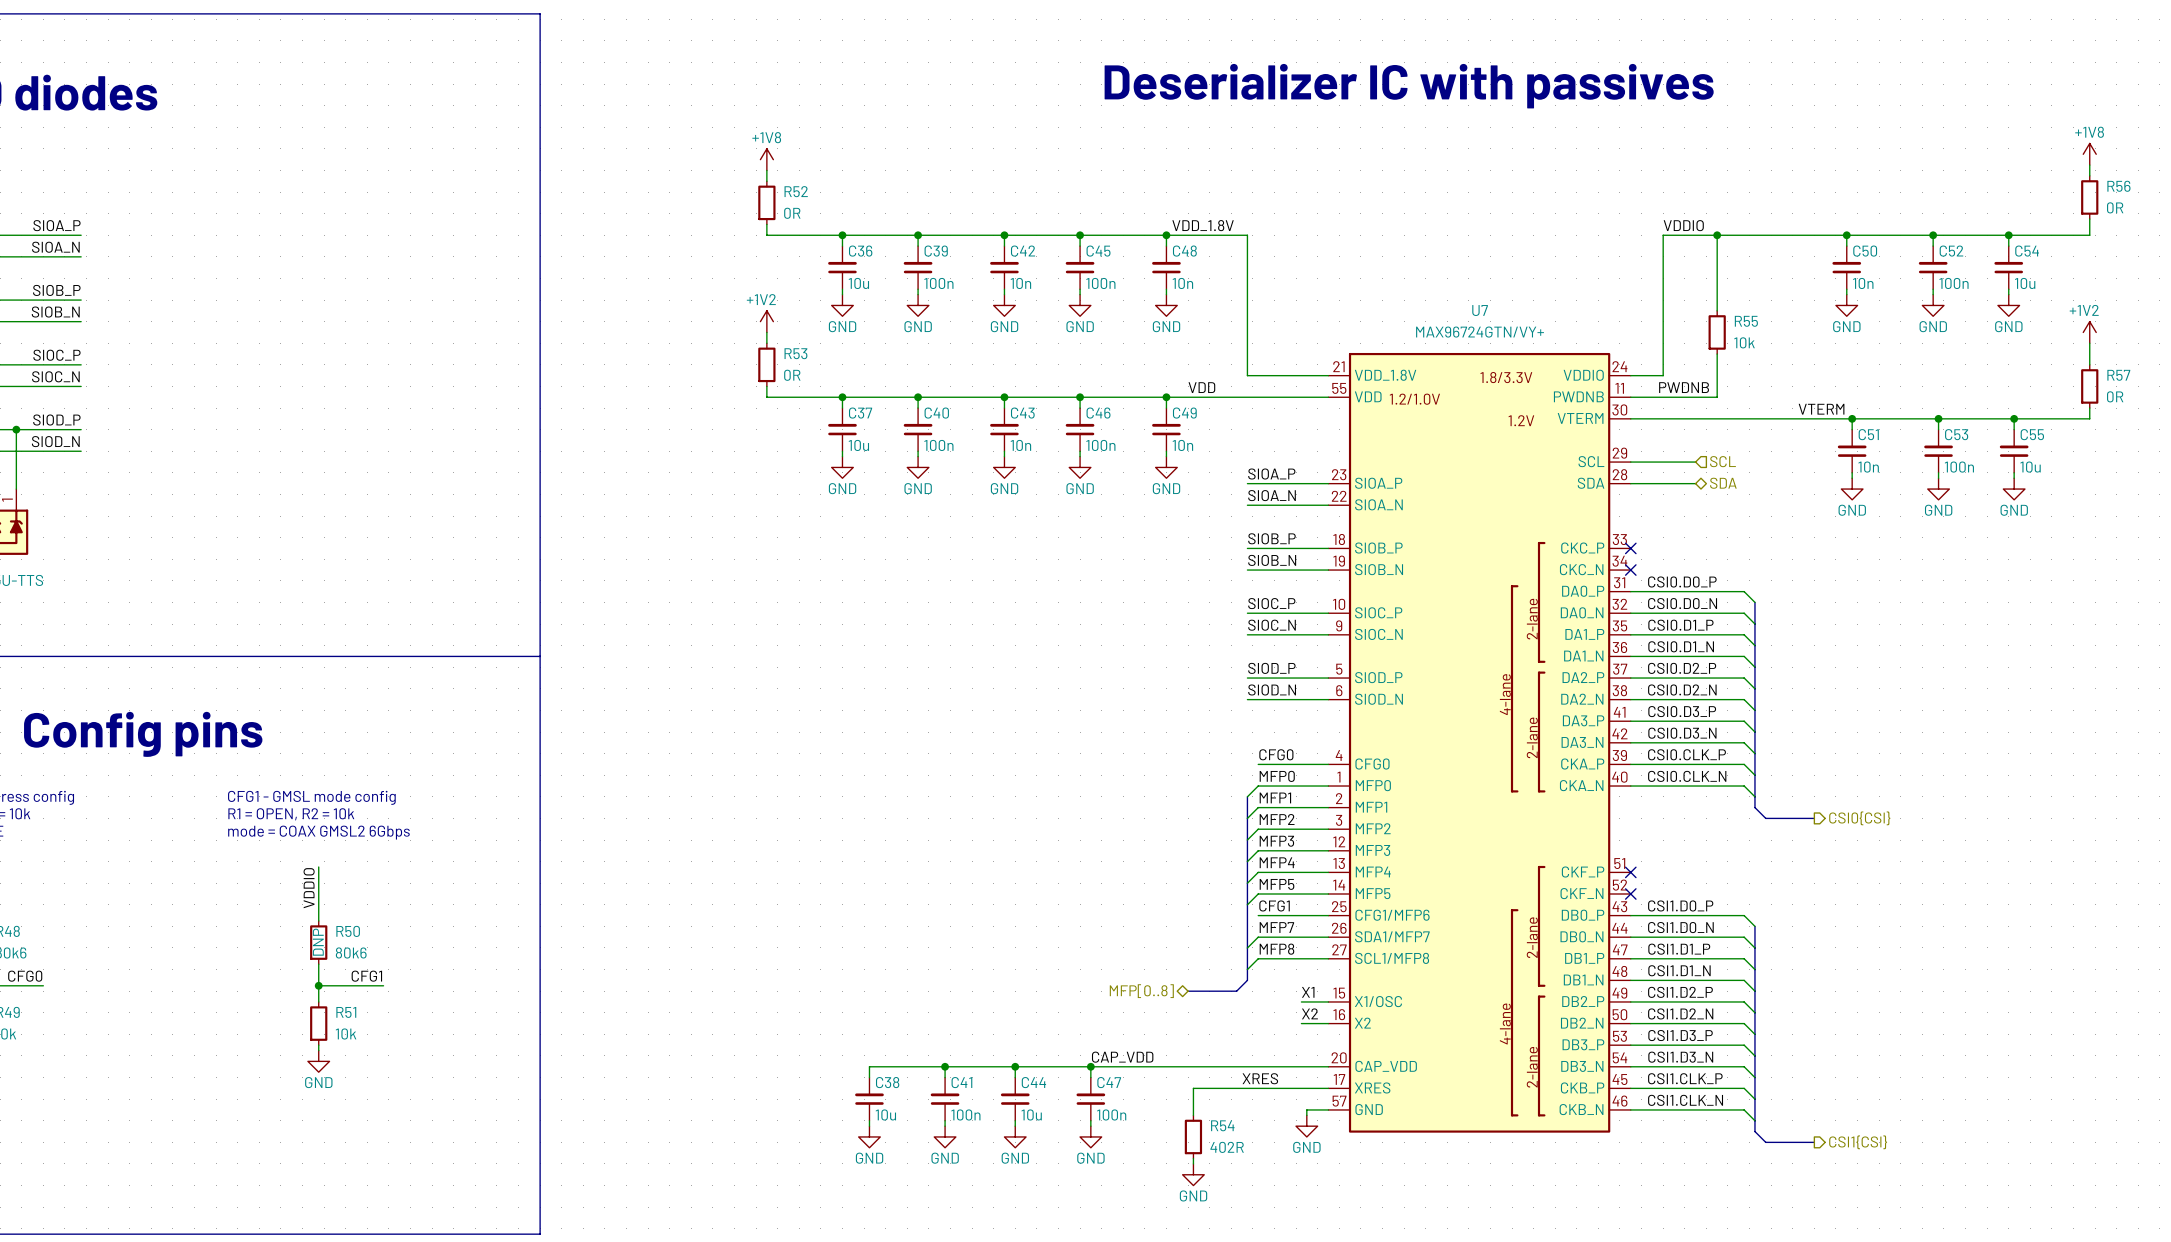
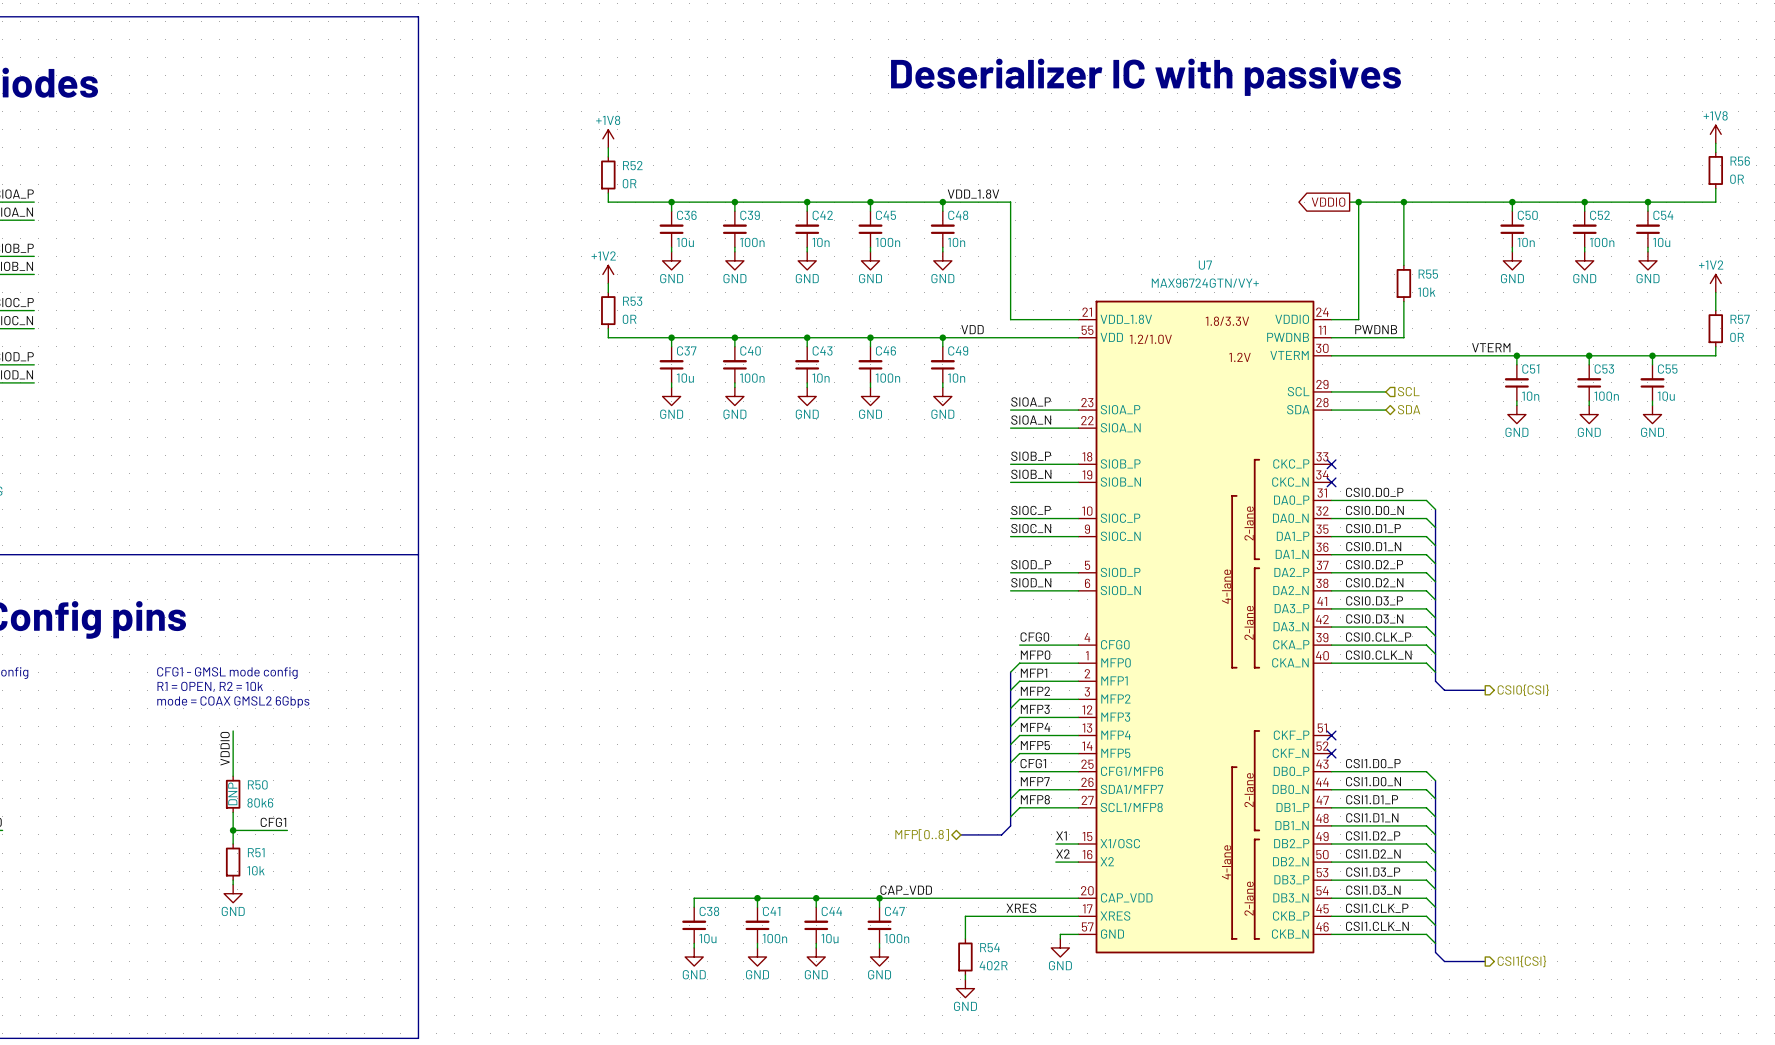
label: VDDIO (1683, 225) -> none
global label: none -> VDDIO (1328, 202)
wire: none -> (1349, 202) (1358, 202)
junction: none -> (1358, 202)

